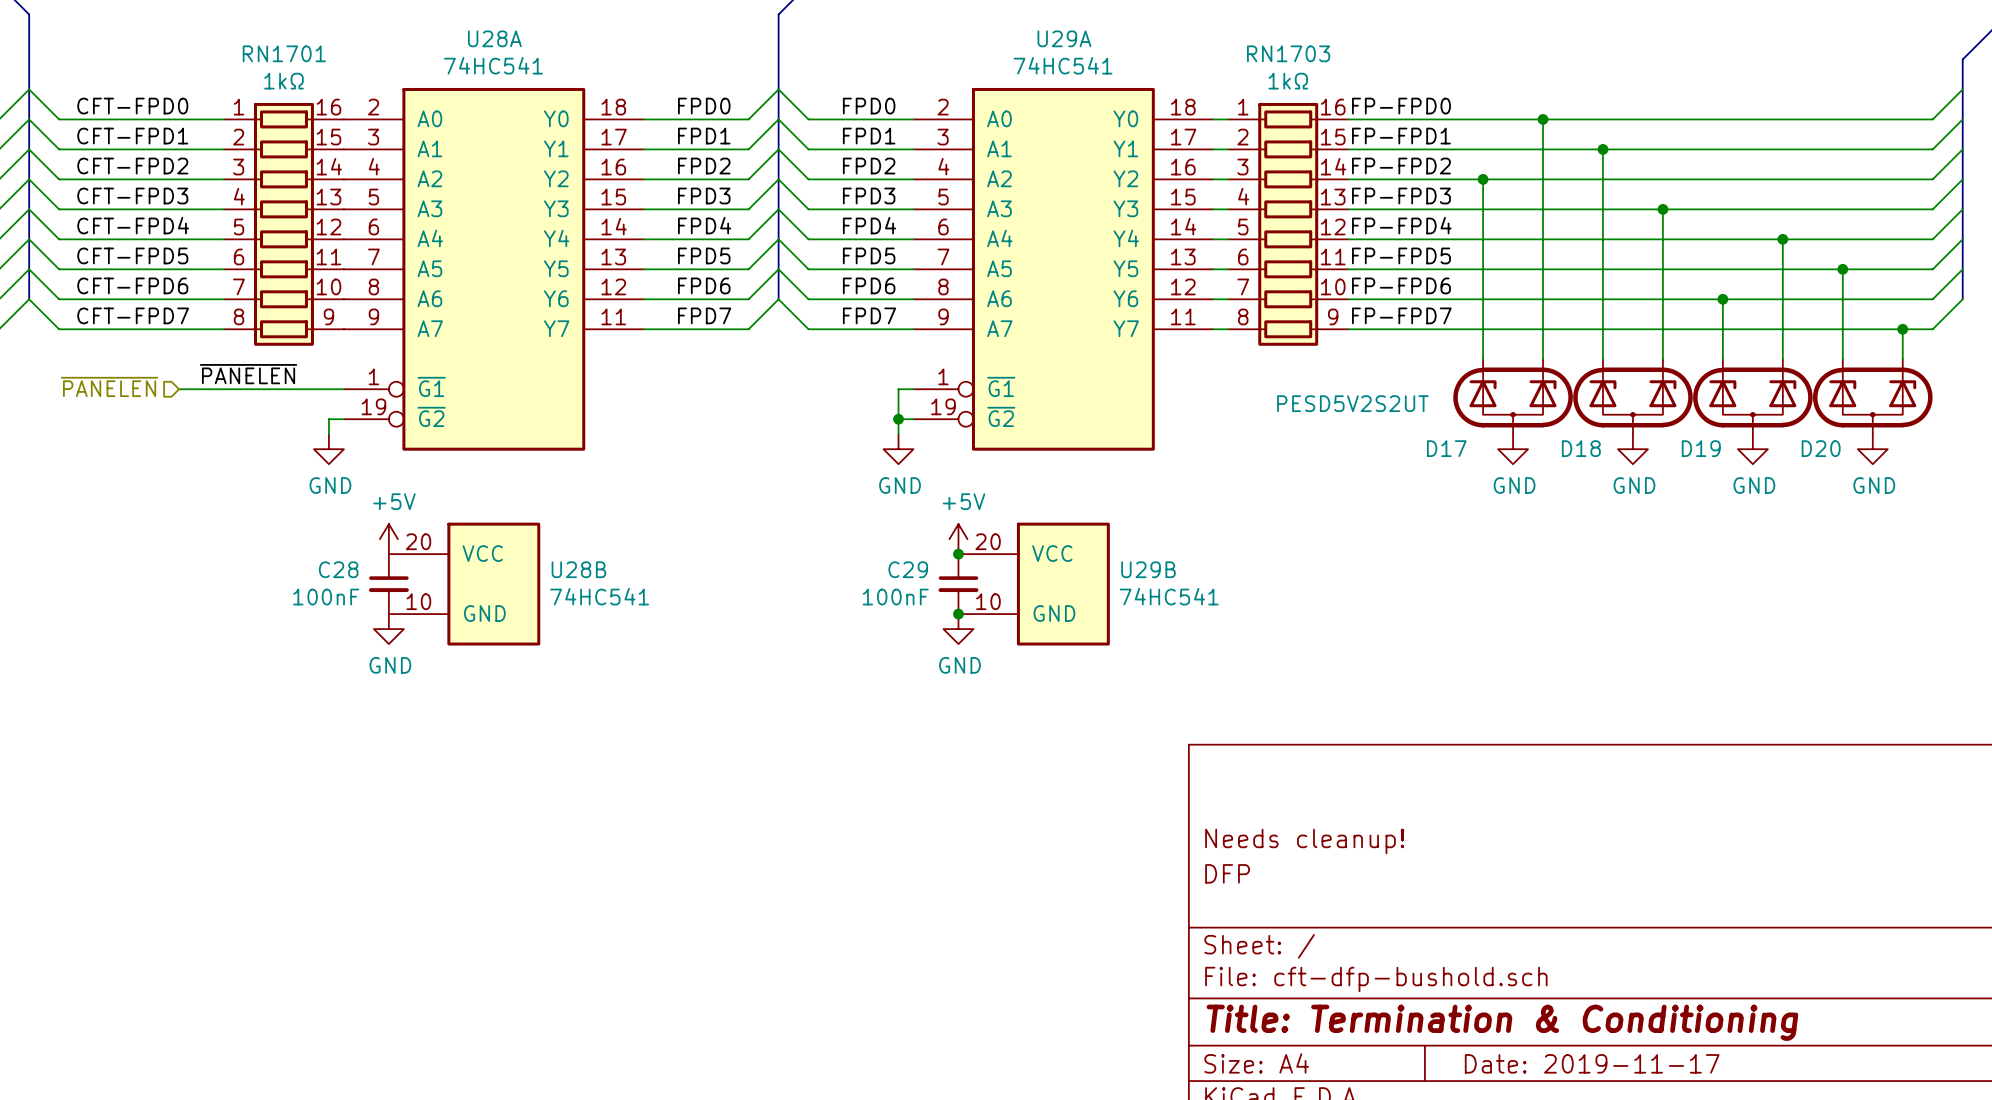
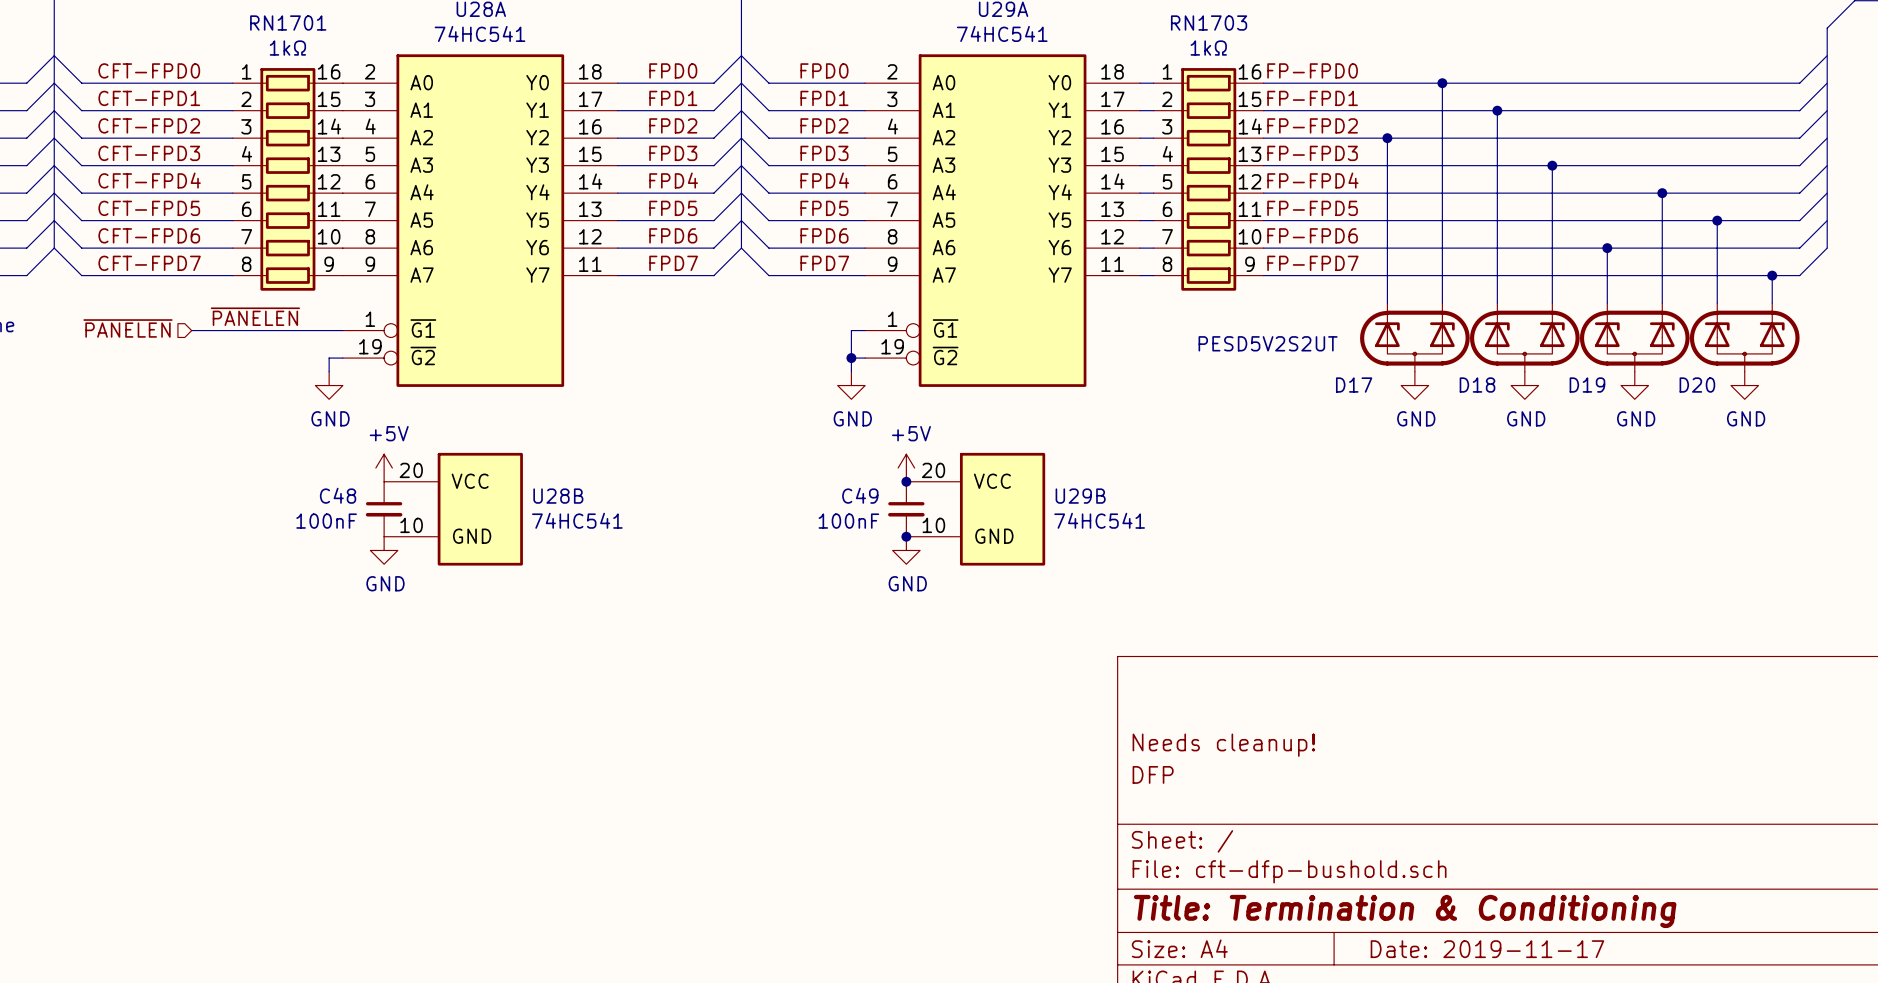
C28 name: C28 (338, 569) -> C48 (338, 495)
C29 name: C29 (908, 569) -> C49 (860, 495)

